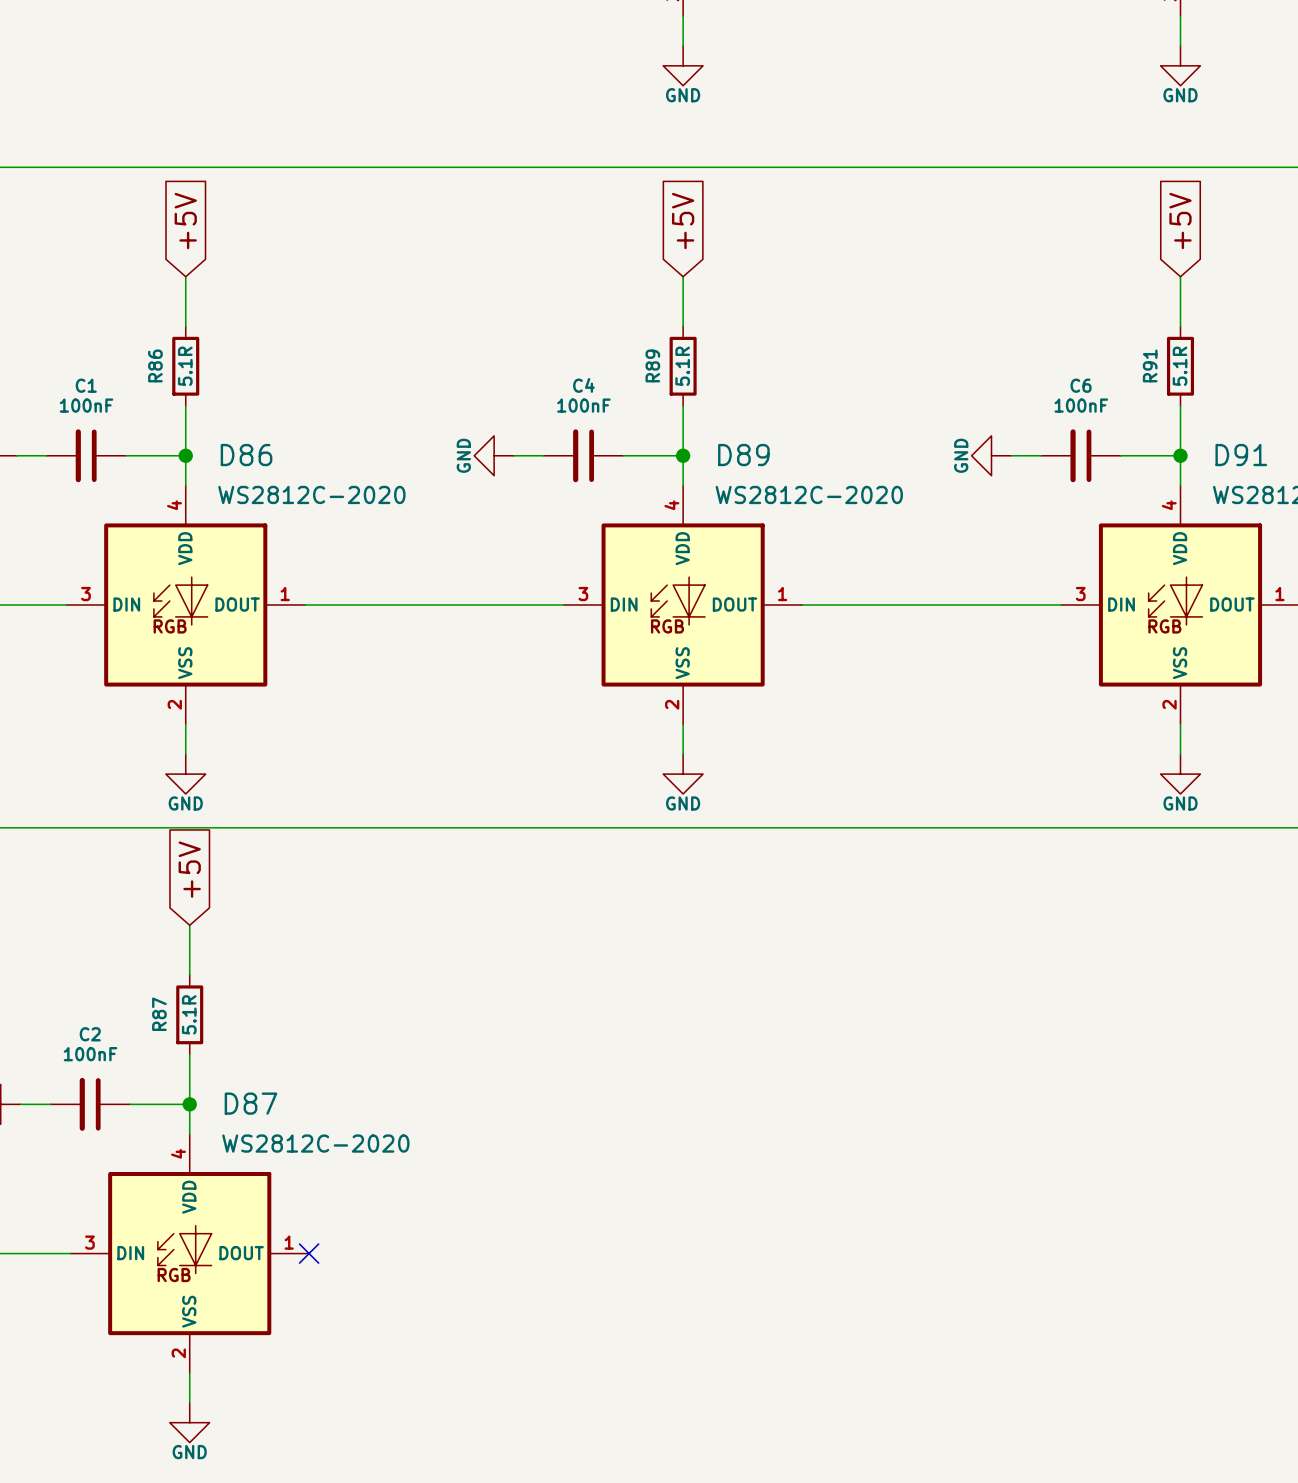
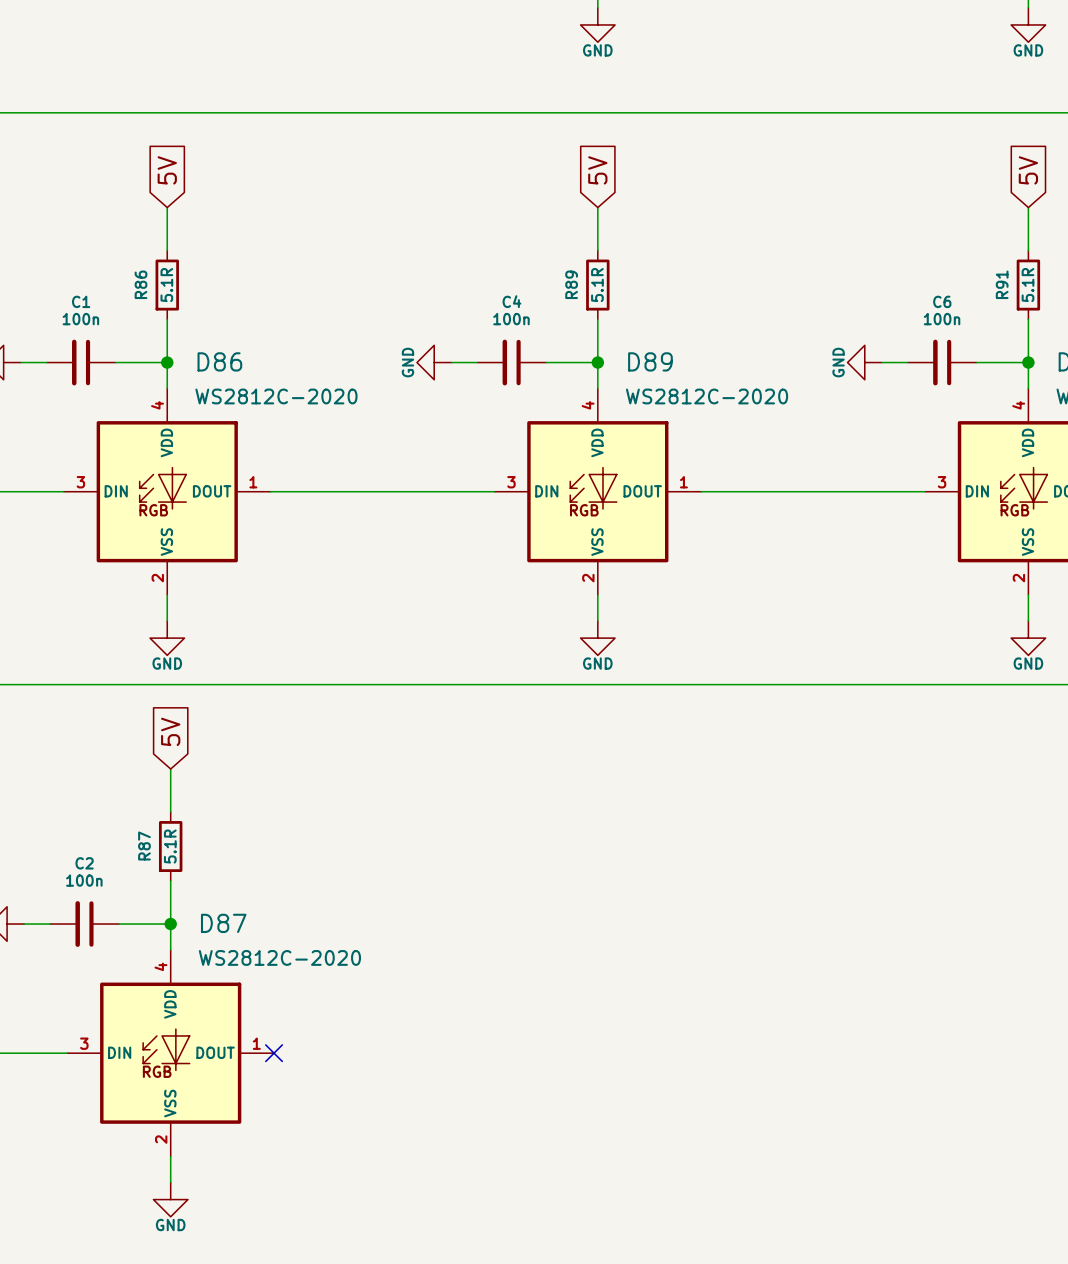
global label: +5V (185, 221) -> 5V (167, 170)
global label: +5V (683, 221) -> 5V (597, 170)
global label: +5V (1180, 221) -> 5V (1028, 170)
C1 value: 100nF (86, 405) -> 100n (80, 319)
C4 value: 100nF (583, 405) -> 100n (511, 319)
C6 value: 100nF (1081, 405) -> 100n (942, 319)
global label: +5V (189, 869) -> 5V (170, 731)
C2 value: 100nF (90, 1054) -> 100n (84, 880)

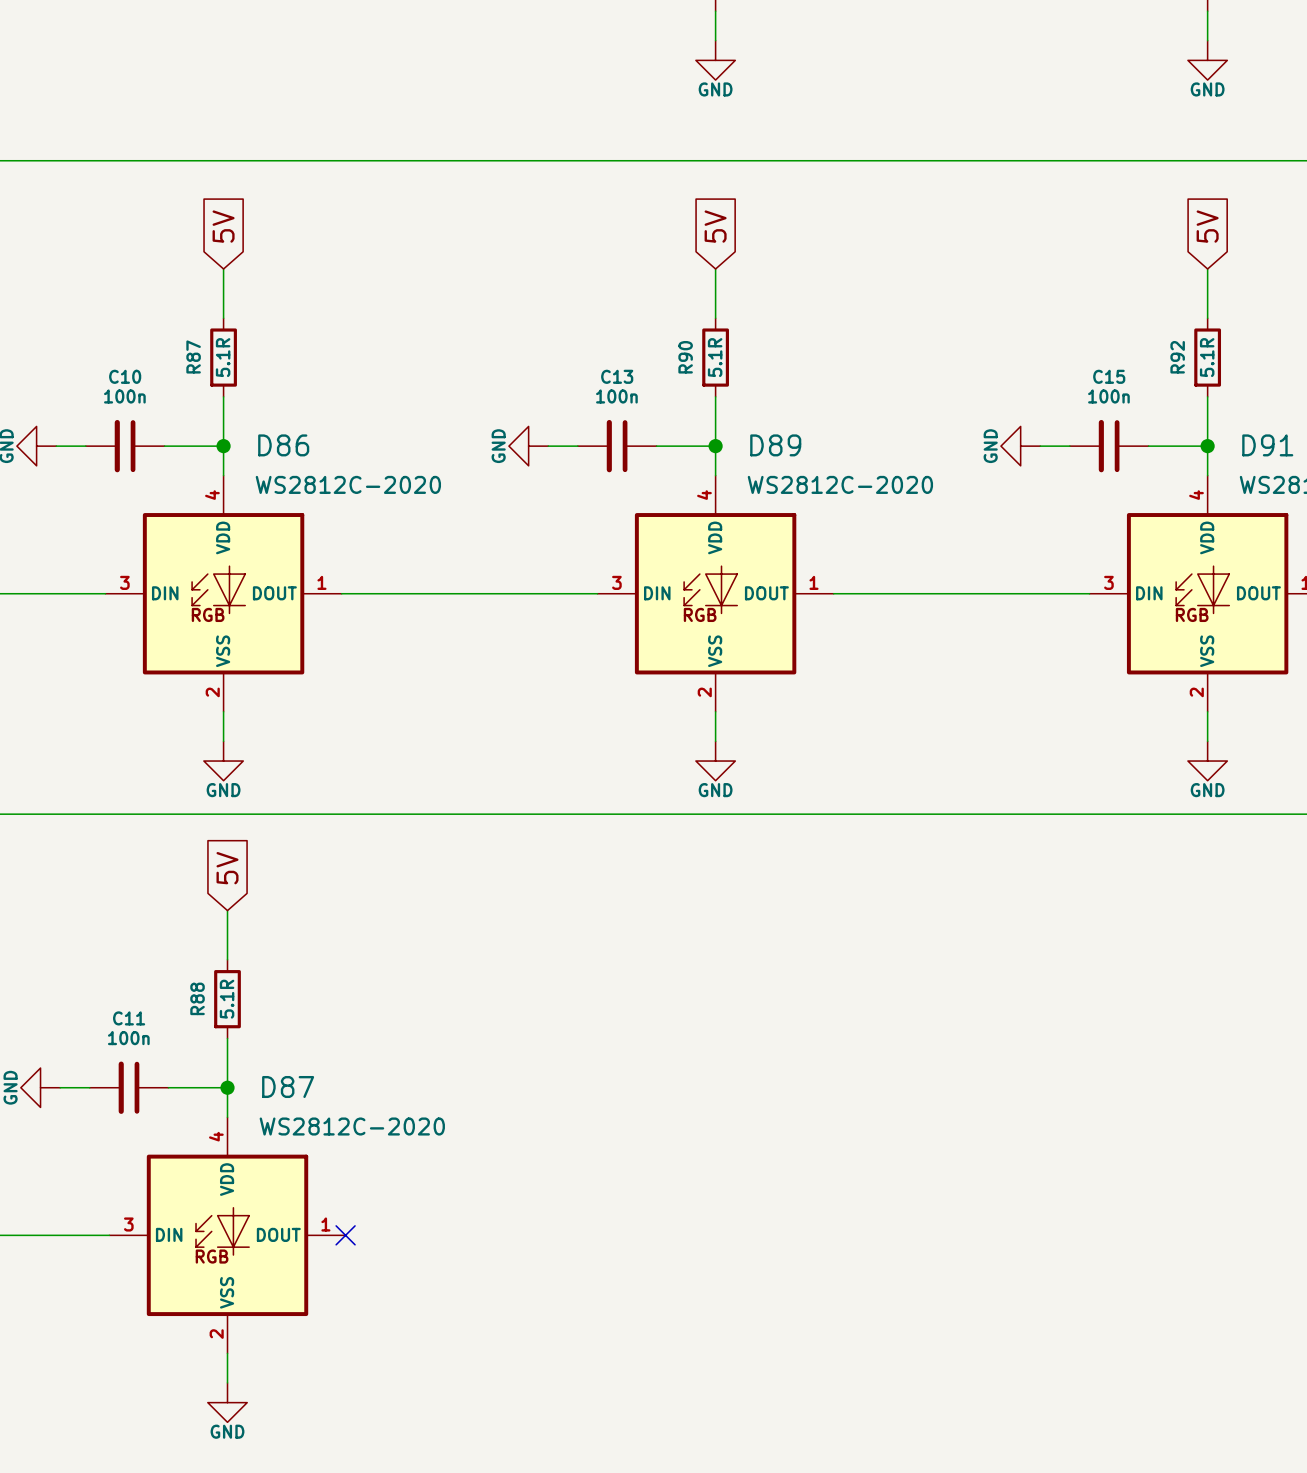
R86 name: R86 (141, 284) -> R87 (193, 356)
R89 name: R89 (571, 284) -> R90 (685, 357)
R91 name: R91 (1002, 284) -> R92 (1177, 357)
C1 name: C1 (81, 301) -> C10 (125, 376)
C4 name: C4 (511, 301) -> C13 (617, 376)
C6 name: C6 (942, 301) -> C15 (1109, 376)
R87 name: R87 (144, 846) -> R88 (197, 998)
C2 name: C2 (84, 863) -> C11 (129, 1018)

